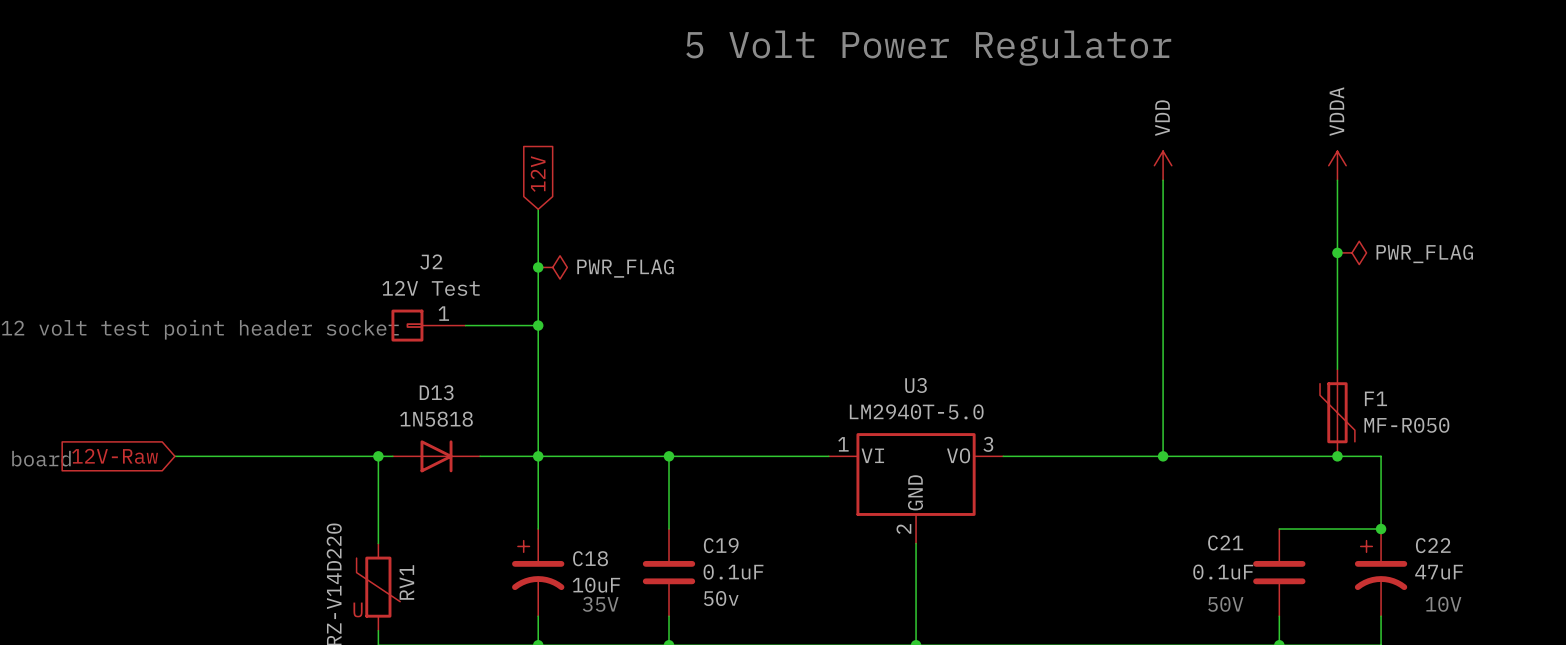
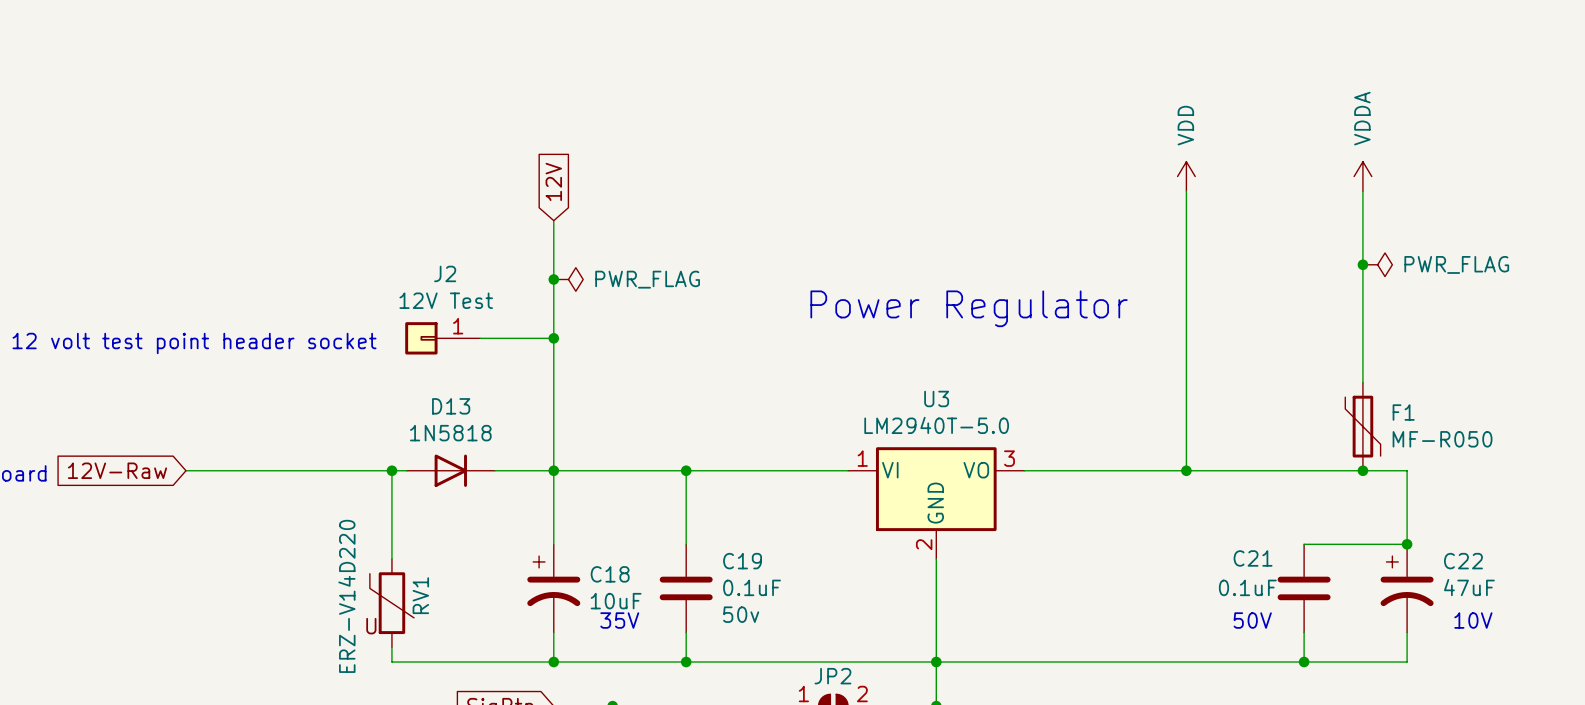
text: 5 Volt Power Regulator (928, 48) -> none
text: none -> Power Regulator (969, 308)

